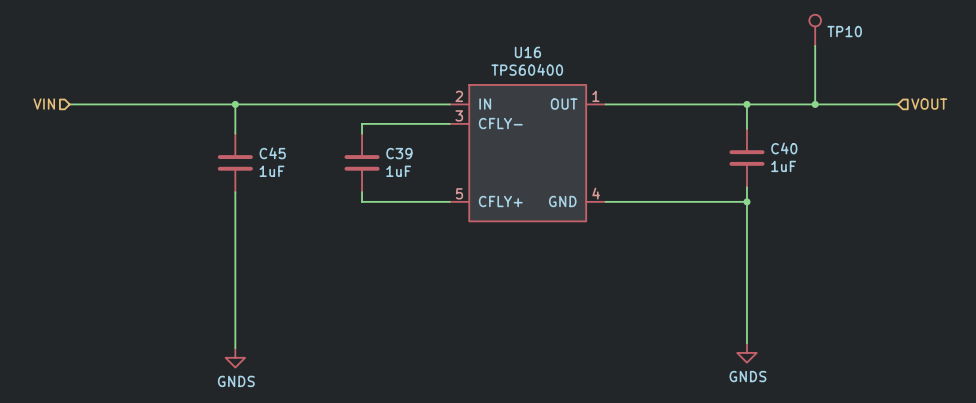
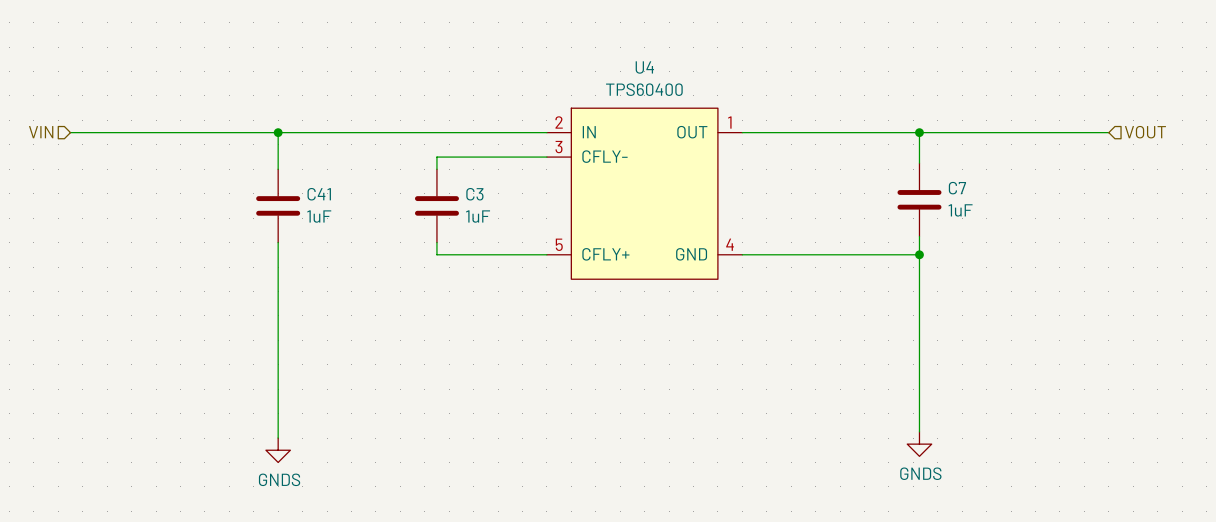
TP10: (815, 30) -> none
wire: (815, 45) (815, 104) -> none
U16 name: U16 (527, 52) -> U4 (644, 67)
junction: (815, 104) -> none
C40 name: C40 (784, 148) -> C7 (957, 188)
C45 name: C45 (272, 153) -> C41 (319, 194)
C39 name: C39 (399, 153) -> C3 (474, 194)

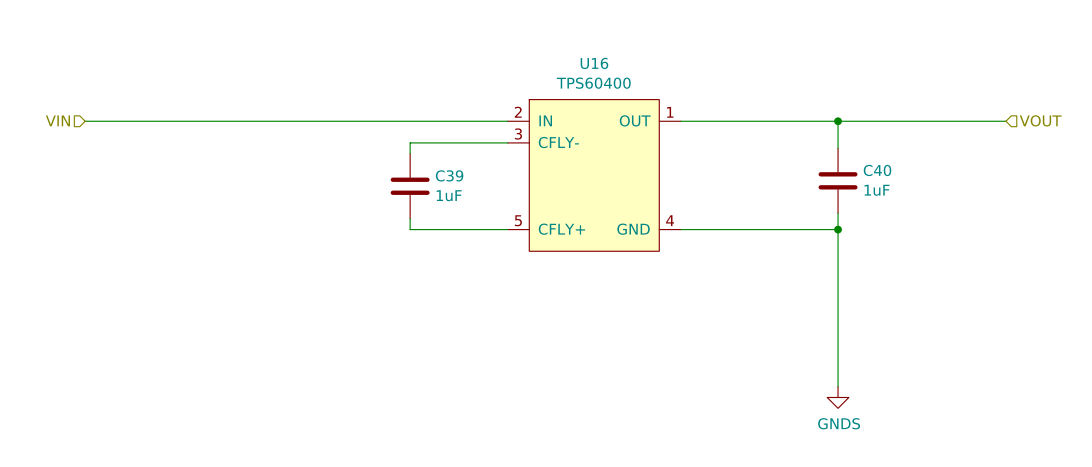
U4 name: U4 (644, 67) -> U16 (594, 63)
wire: (278, 132) (278, 169) -> none
junction: (278, 132) -> none
C7 name: C7 (957, 188) -> C40 (877, 170)
C3 name: C3 (474, 194) -> C39 (449, 175)
C41: 1uF (278, 205) -> none
wire: (278, 242) (278, 438) -> none
power symbol: GNDS (278, 450) -> none

